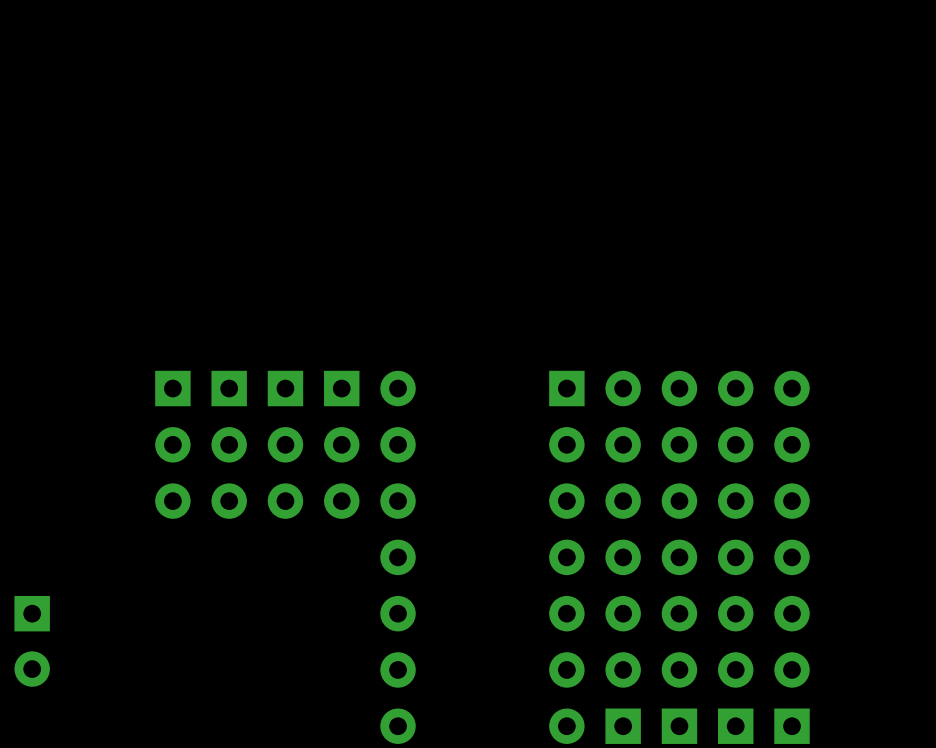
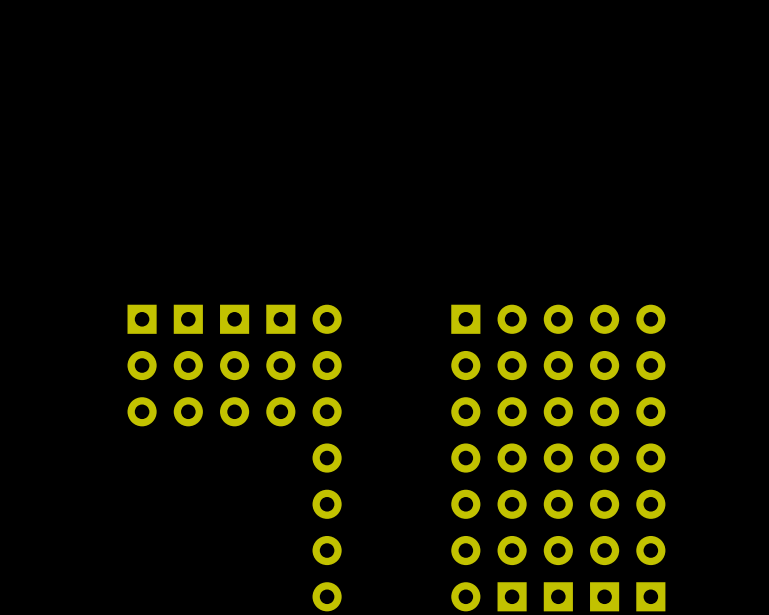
part: (32, 641) -> none

